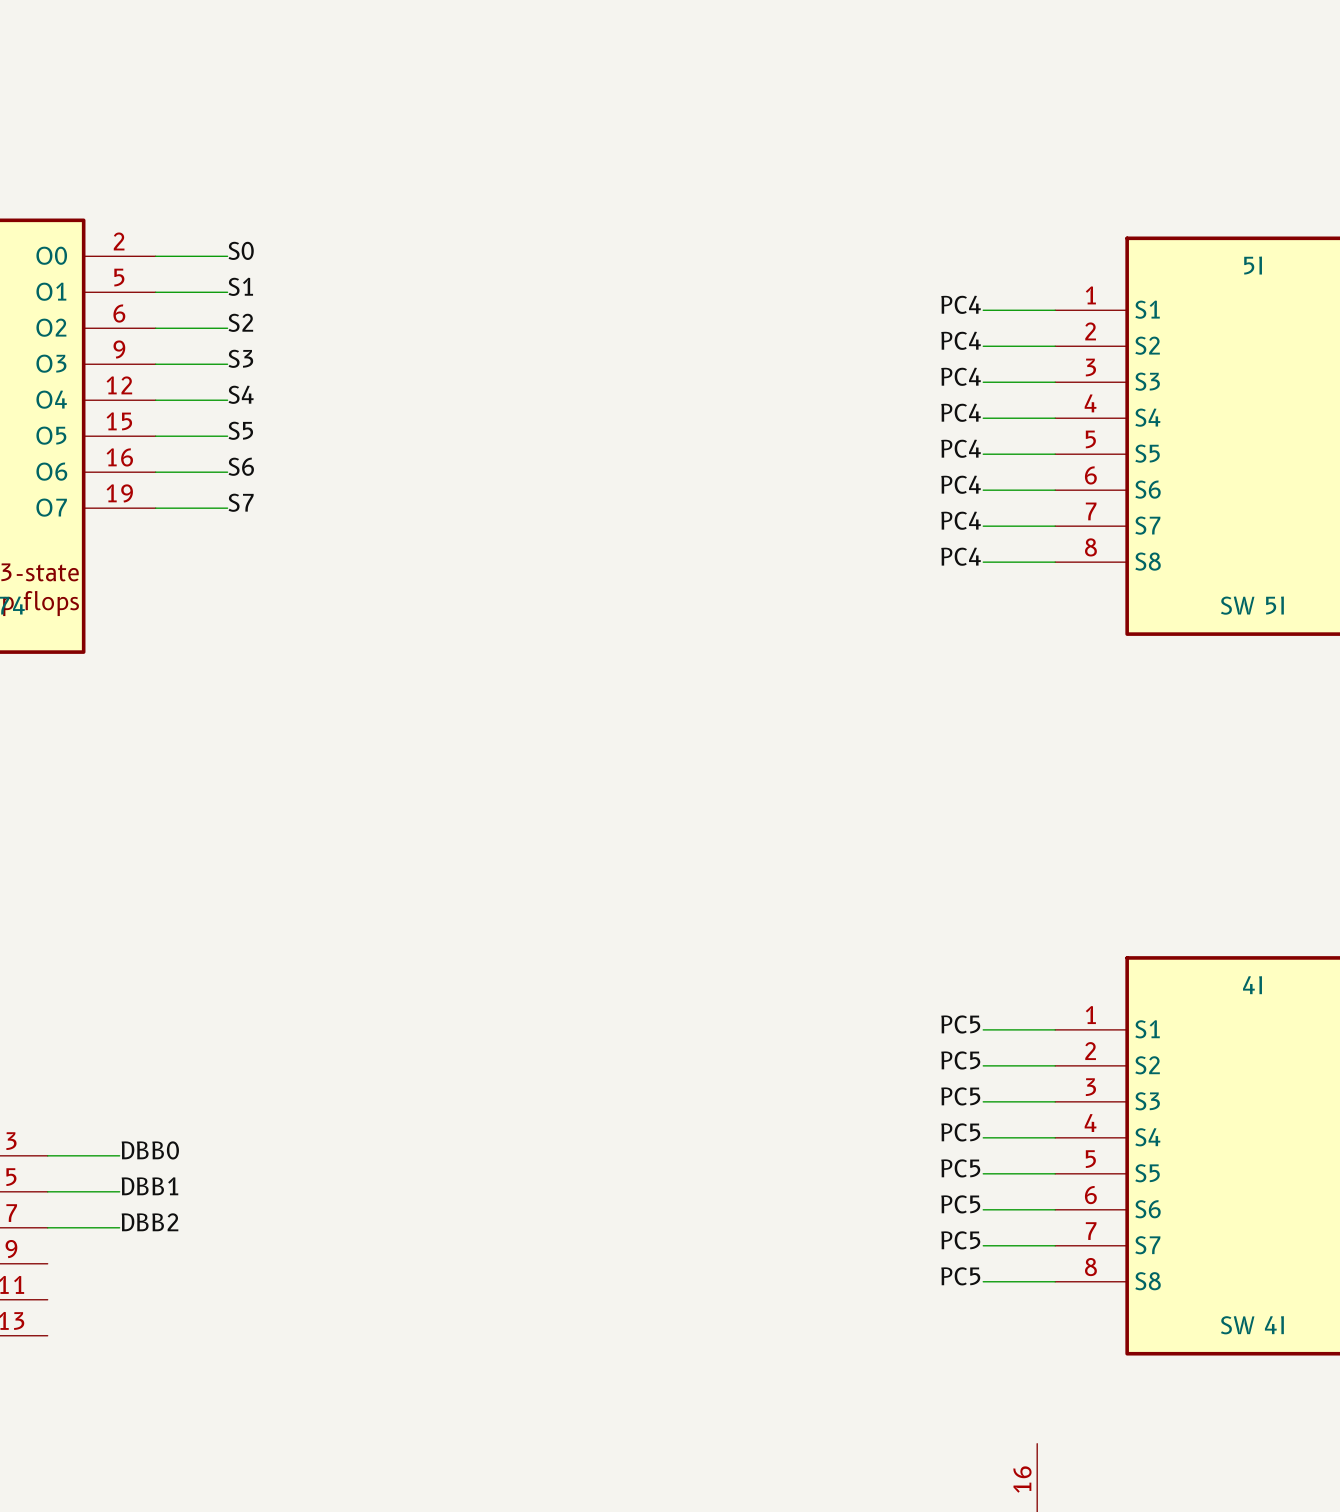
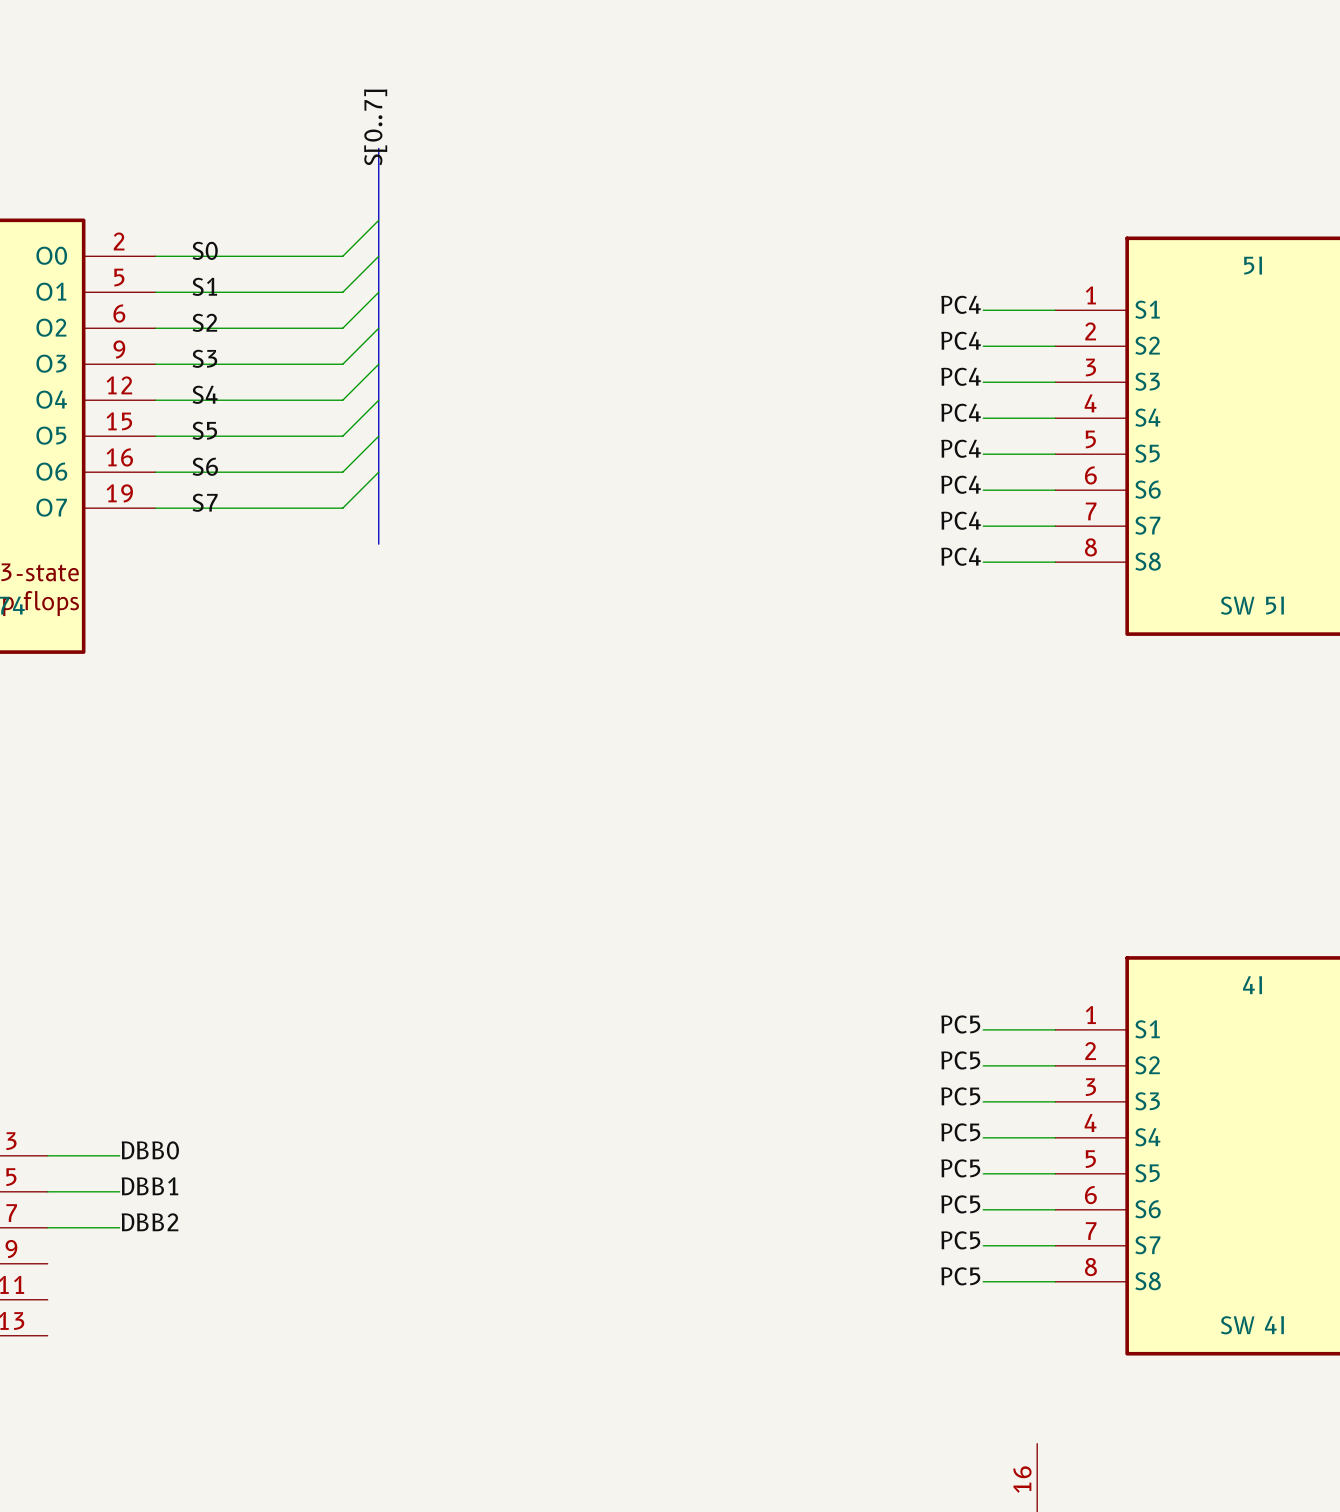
label: none -> S[0..7] (375, 127)
bus: none -> (378, 148) (378, 544)
wire: none -> (378, 220) (342, 256) (227, 256)
label position: S0 (241, 250) -> S0 (205, 250)
wire: none -> (378, 256) (342, 292) (227, 292)
label position: S1 (240, 286) -> S1 (204, 286)
wire: none -> (378, 292) (342, 328) (227, 328)
label position: S2 (240, 322) -> S2 (204, 322)
wire: none -> (378, 328) (342, 364) (227, 364)
label position: S3 (240, 358) -> S3 (204, 358)
wire: none -> (378, 364) (342, 400) (227, 400)
label position: S4 (241, 394) -> S4 (205, 394)
wire: none -> (378, 400) (342, 436) (227, 436)
label position: S5 (240, 430) -> S5 (204, 430)
wire: none -> (378, 436) (342, 472) (227, 472)
label position: S6 (241, 466) -> S6 (205, 466)
wire: none -> (378, 472) (342, 508) (227, 508)
label position: S7 (241, 502) -> S7 (205, 502)

